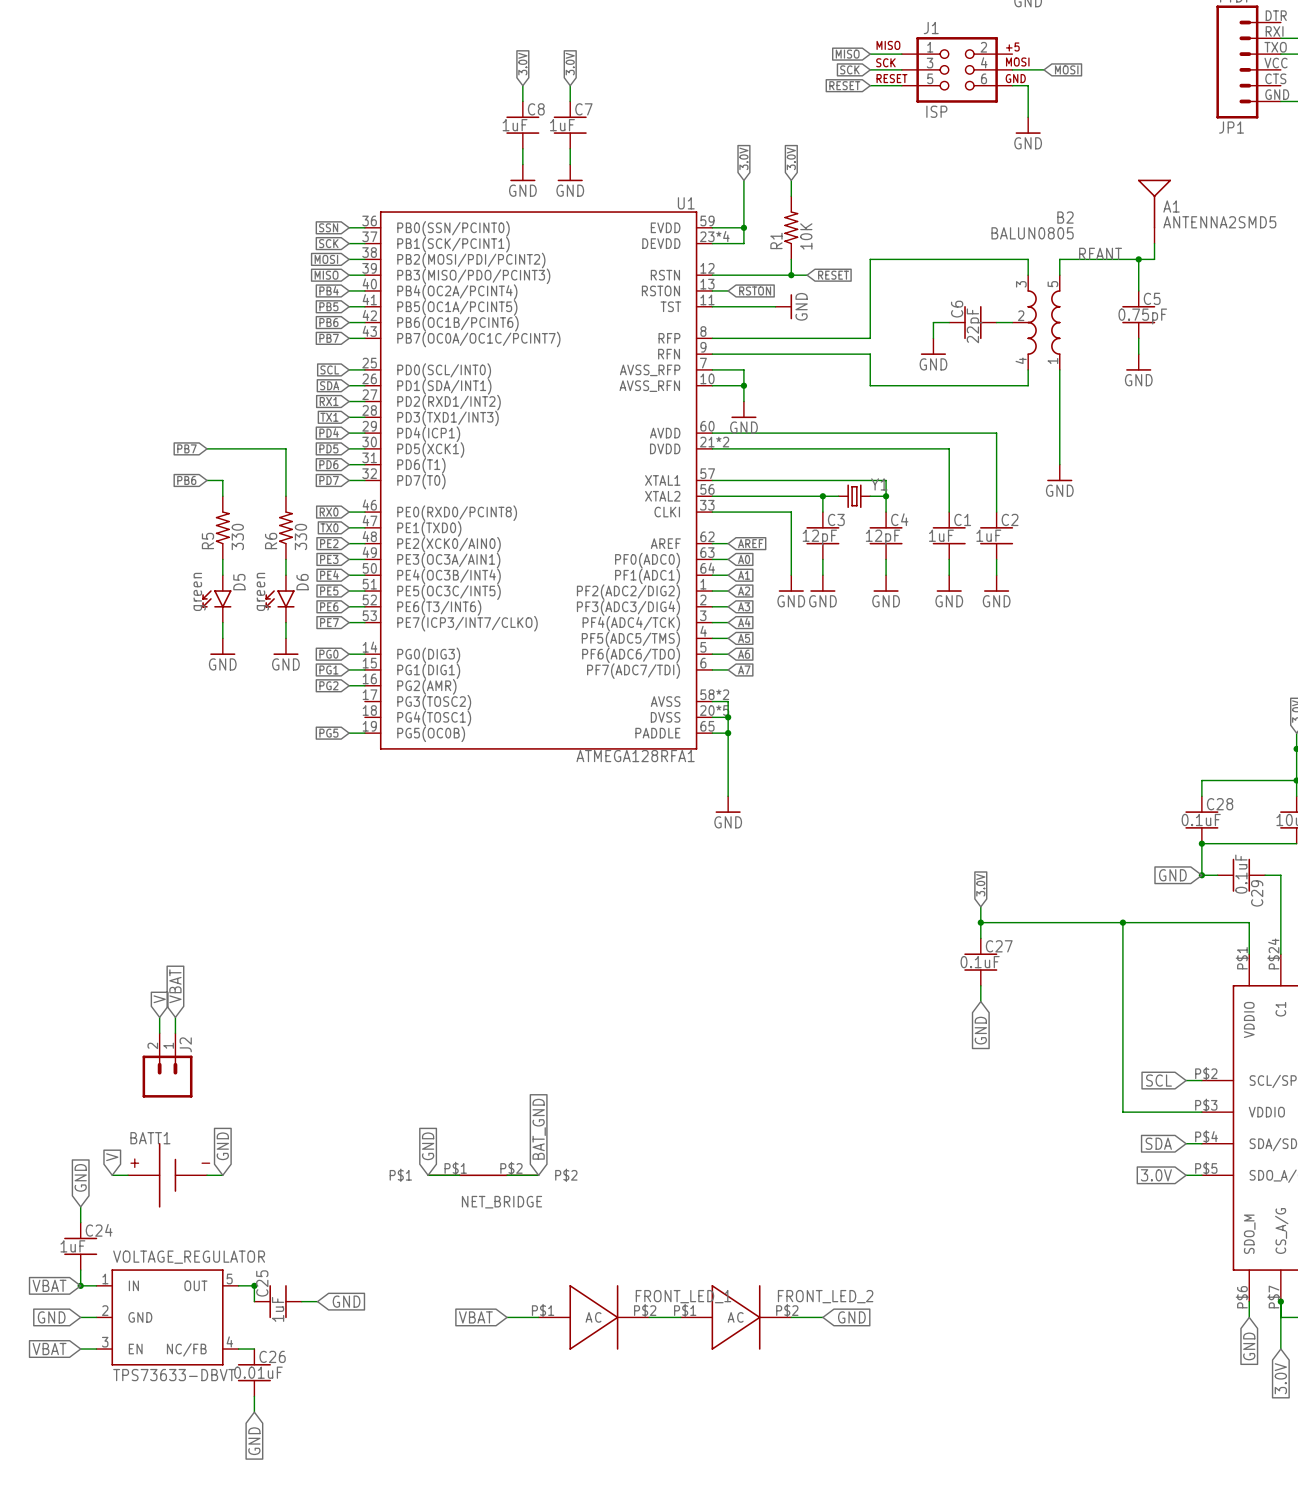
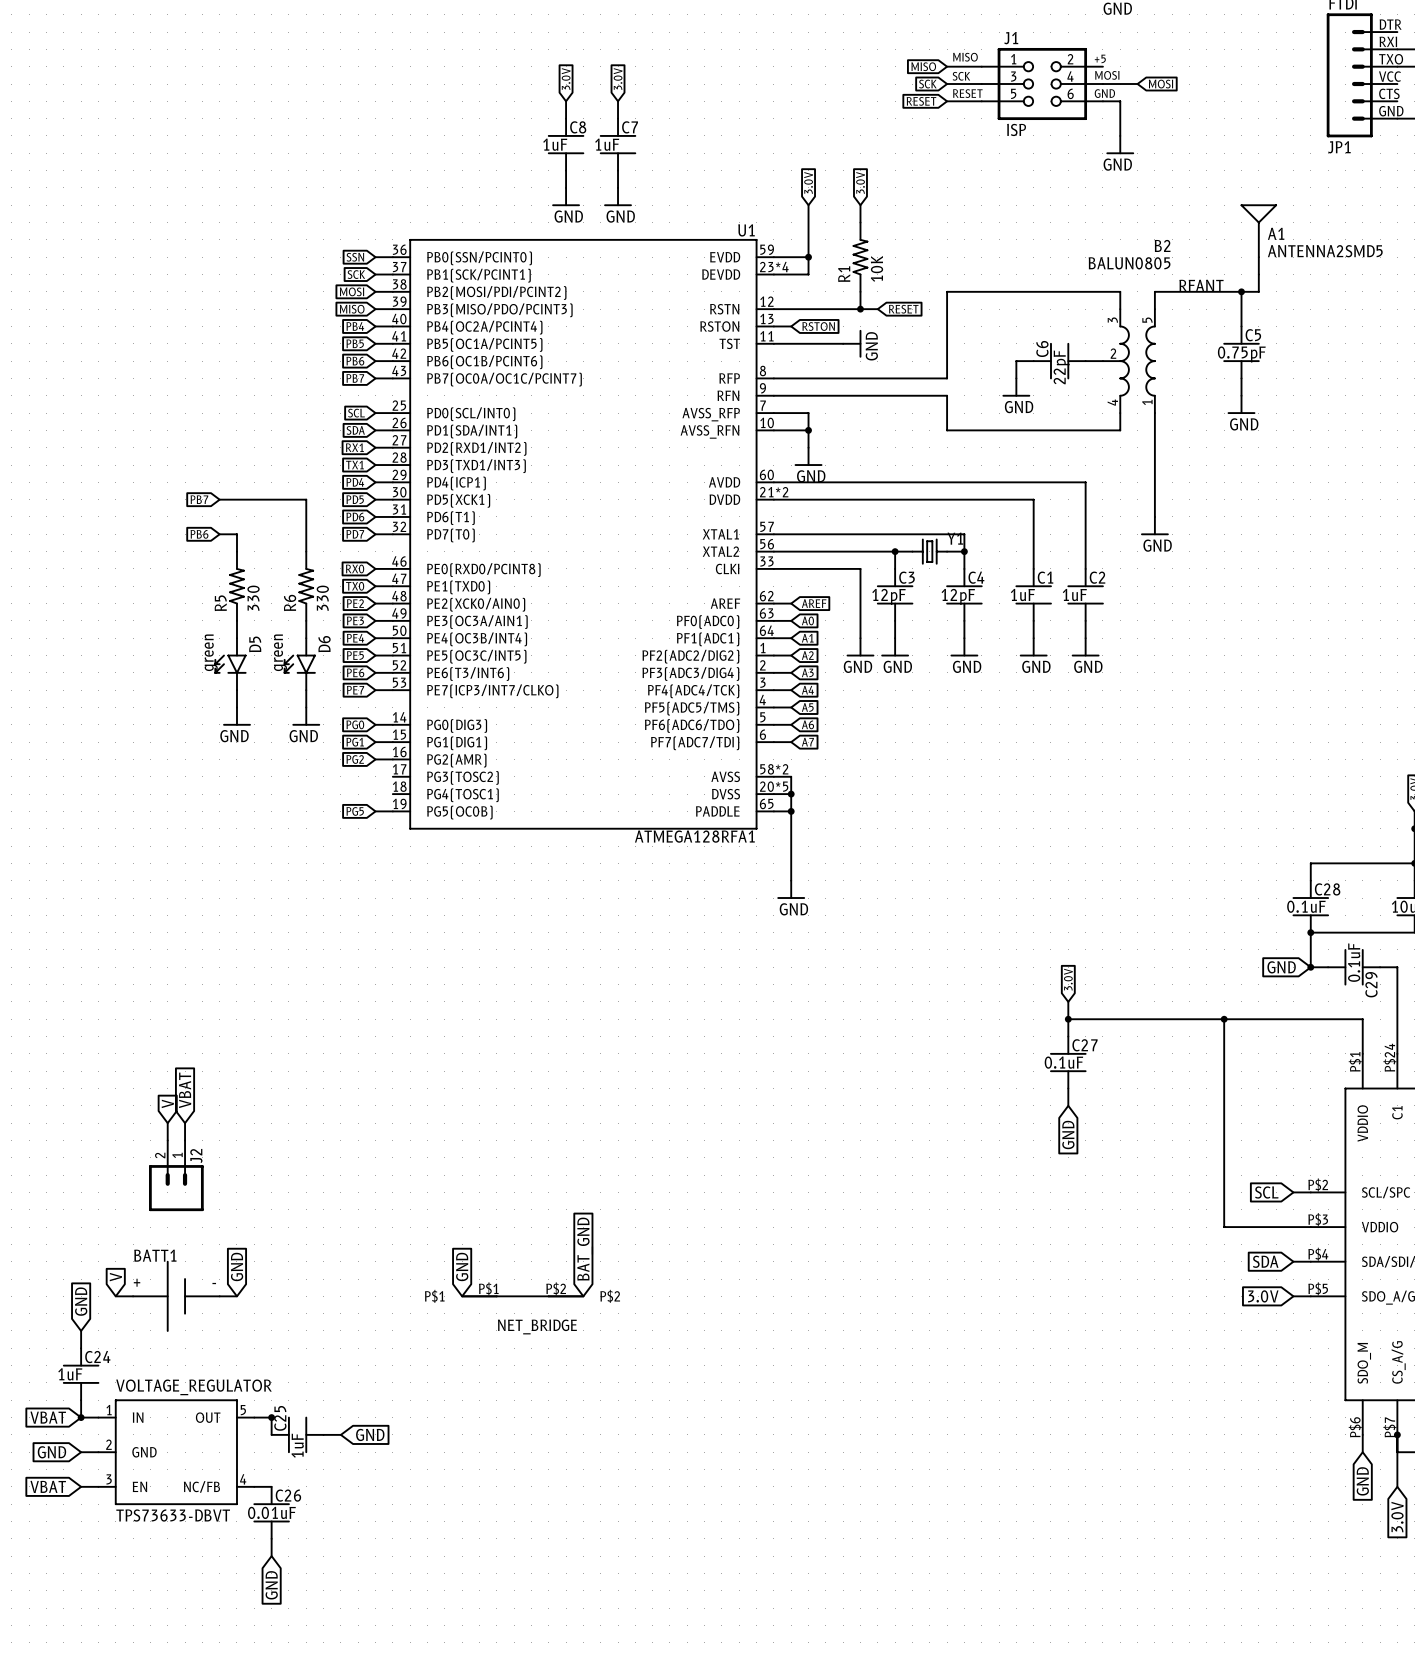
global label: VBAT (475, 1317) -> none
wire: (507, 1317) (538, 1317) -> none
FRONT_LED_1: (593, 1317) -> none
wire: (649, 1317) (680, 1317) -> none
FRONT_LED_2: (736, 1317) -> none
wire: (791, 1317) (822, 1317) -> none
global label: GND (851, 1317) -> none

